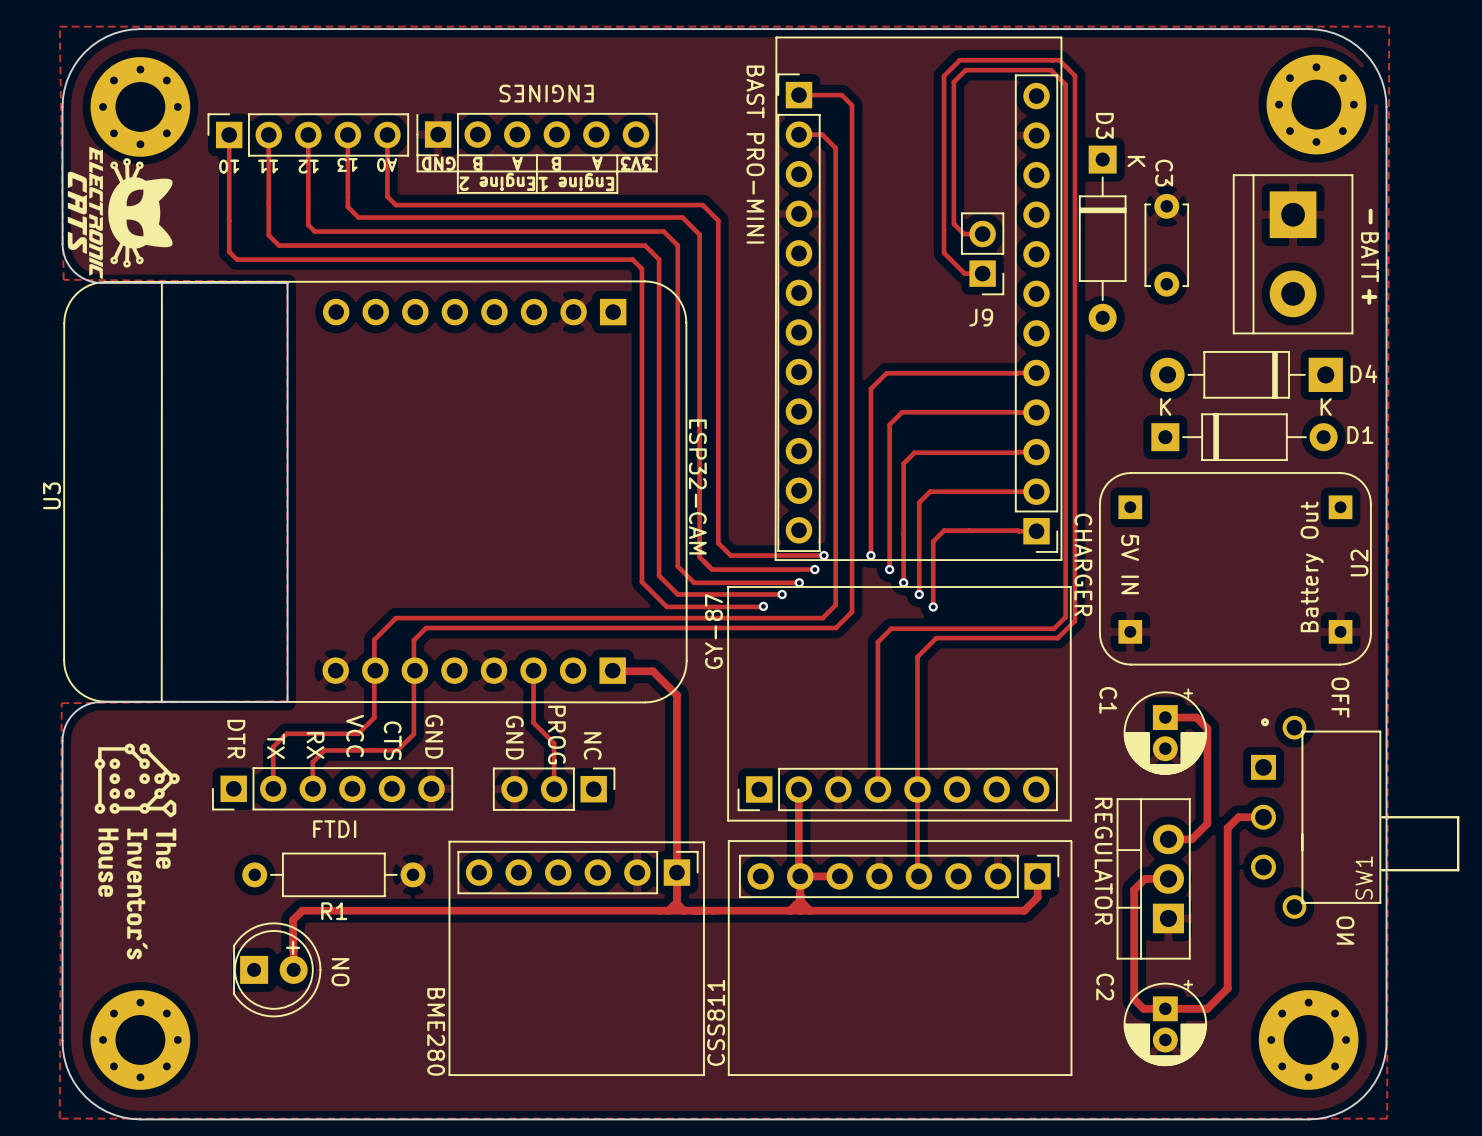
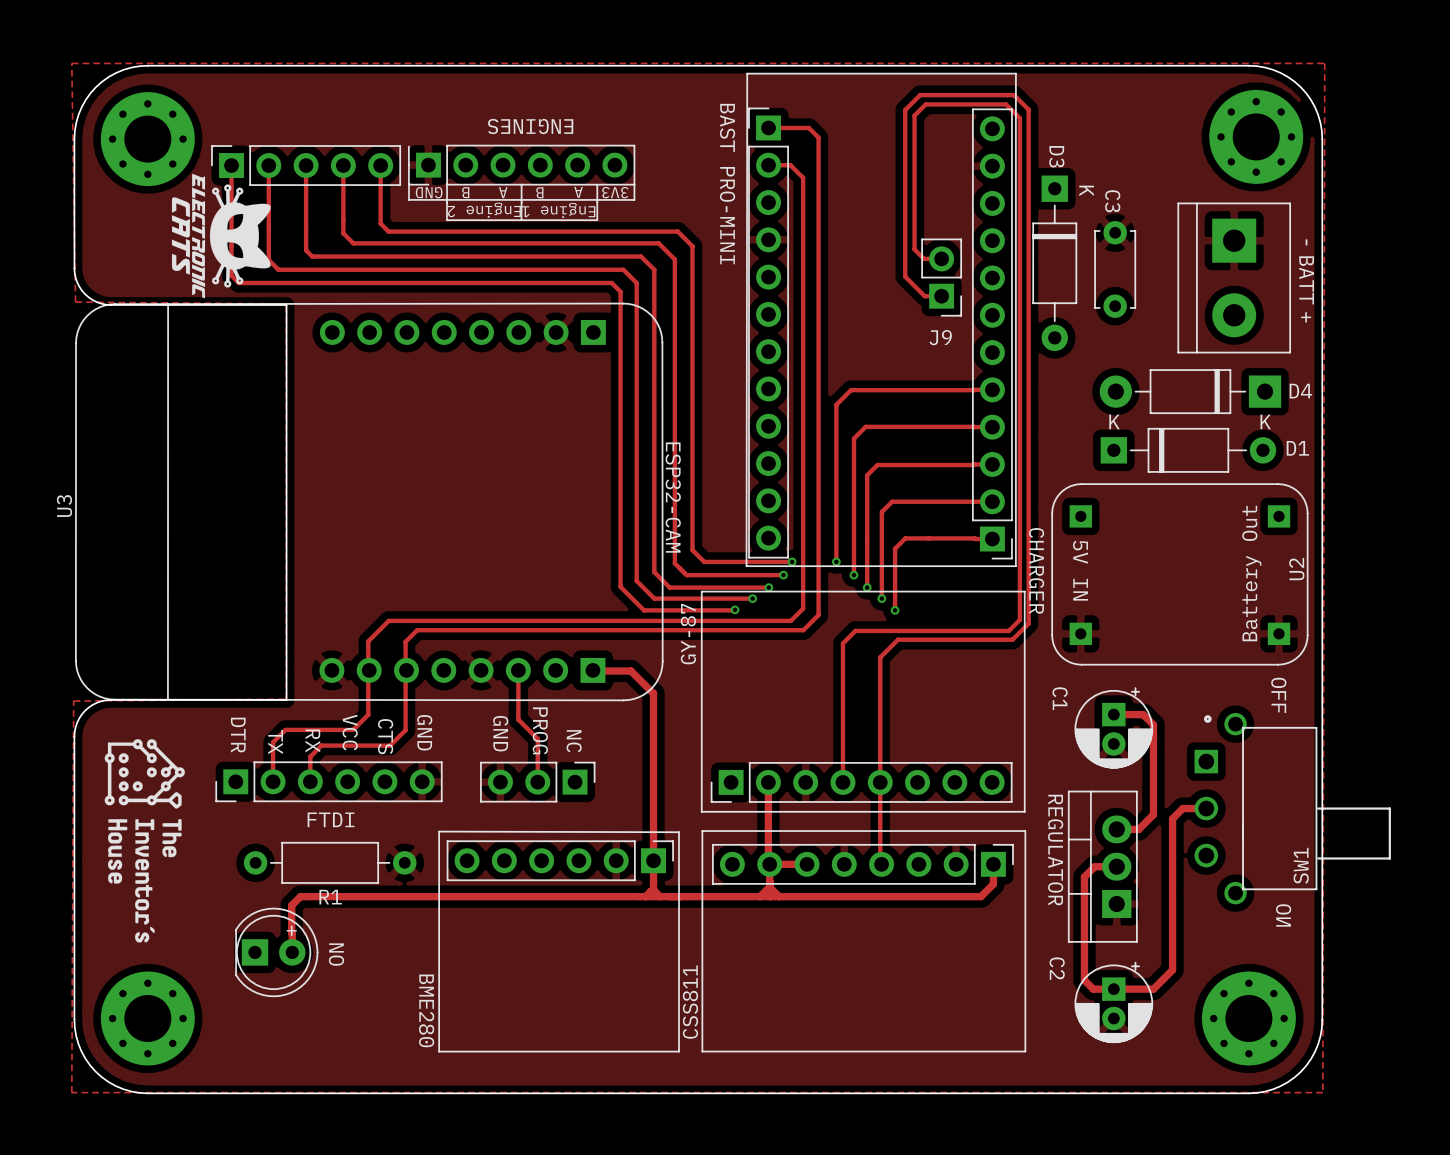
text: 13 (347, 165) -> none
text: A0 (387, 165) -> none
text: 10 (229, 166) -> none
text: 11 (268, 166) -> none
text: 12 (308, 166) -> none
drawing position: (120, 212) -> (221, 236)

